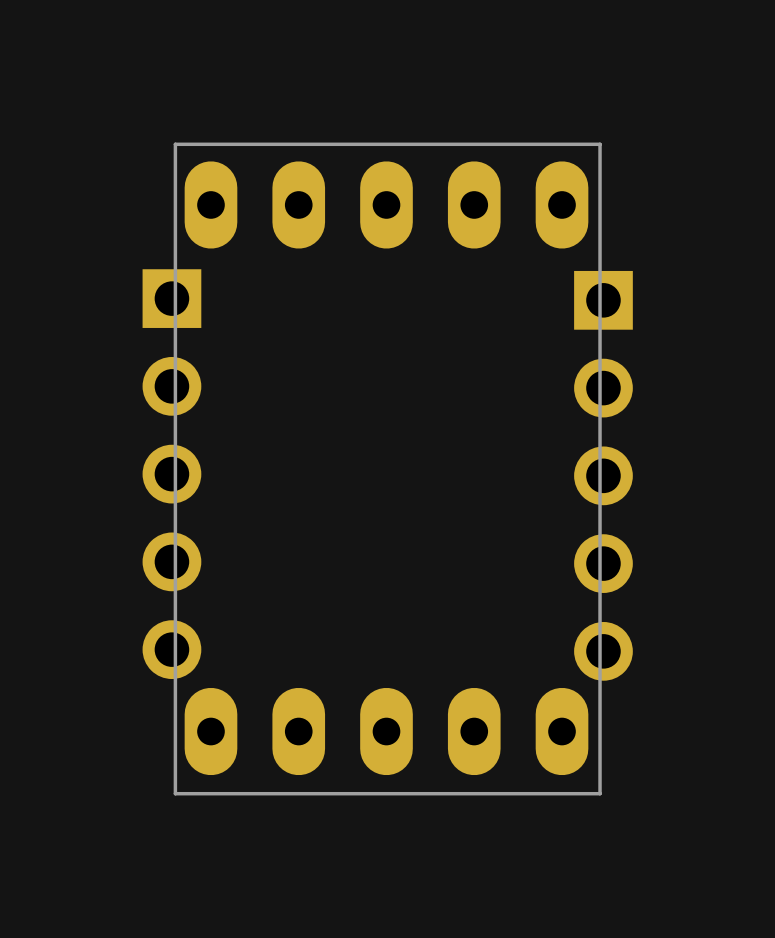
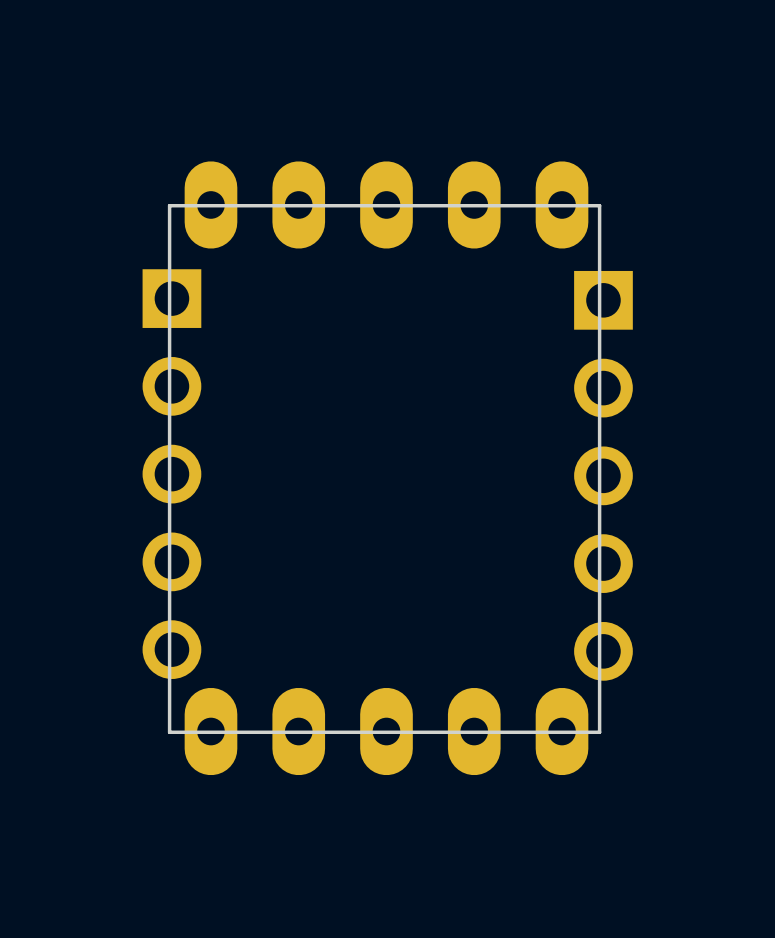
board edge: (600, 144) (175, 144) (175, 793) (600, 793) (600, 144) -> (599, 205) (599, 732) (169, 732) (169, 205) (599, 205)

